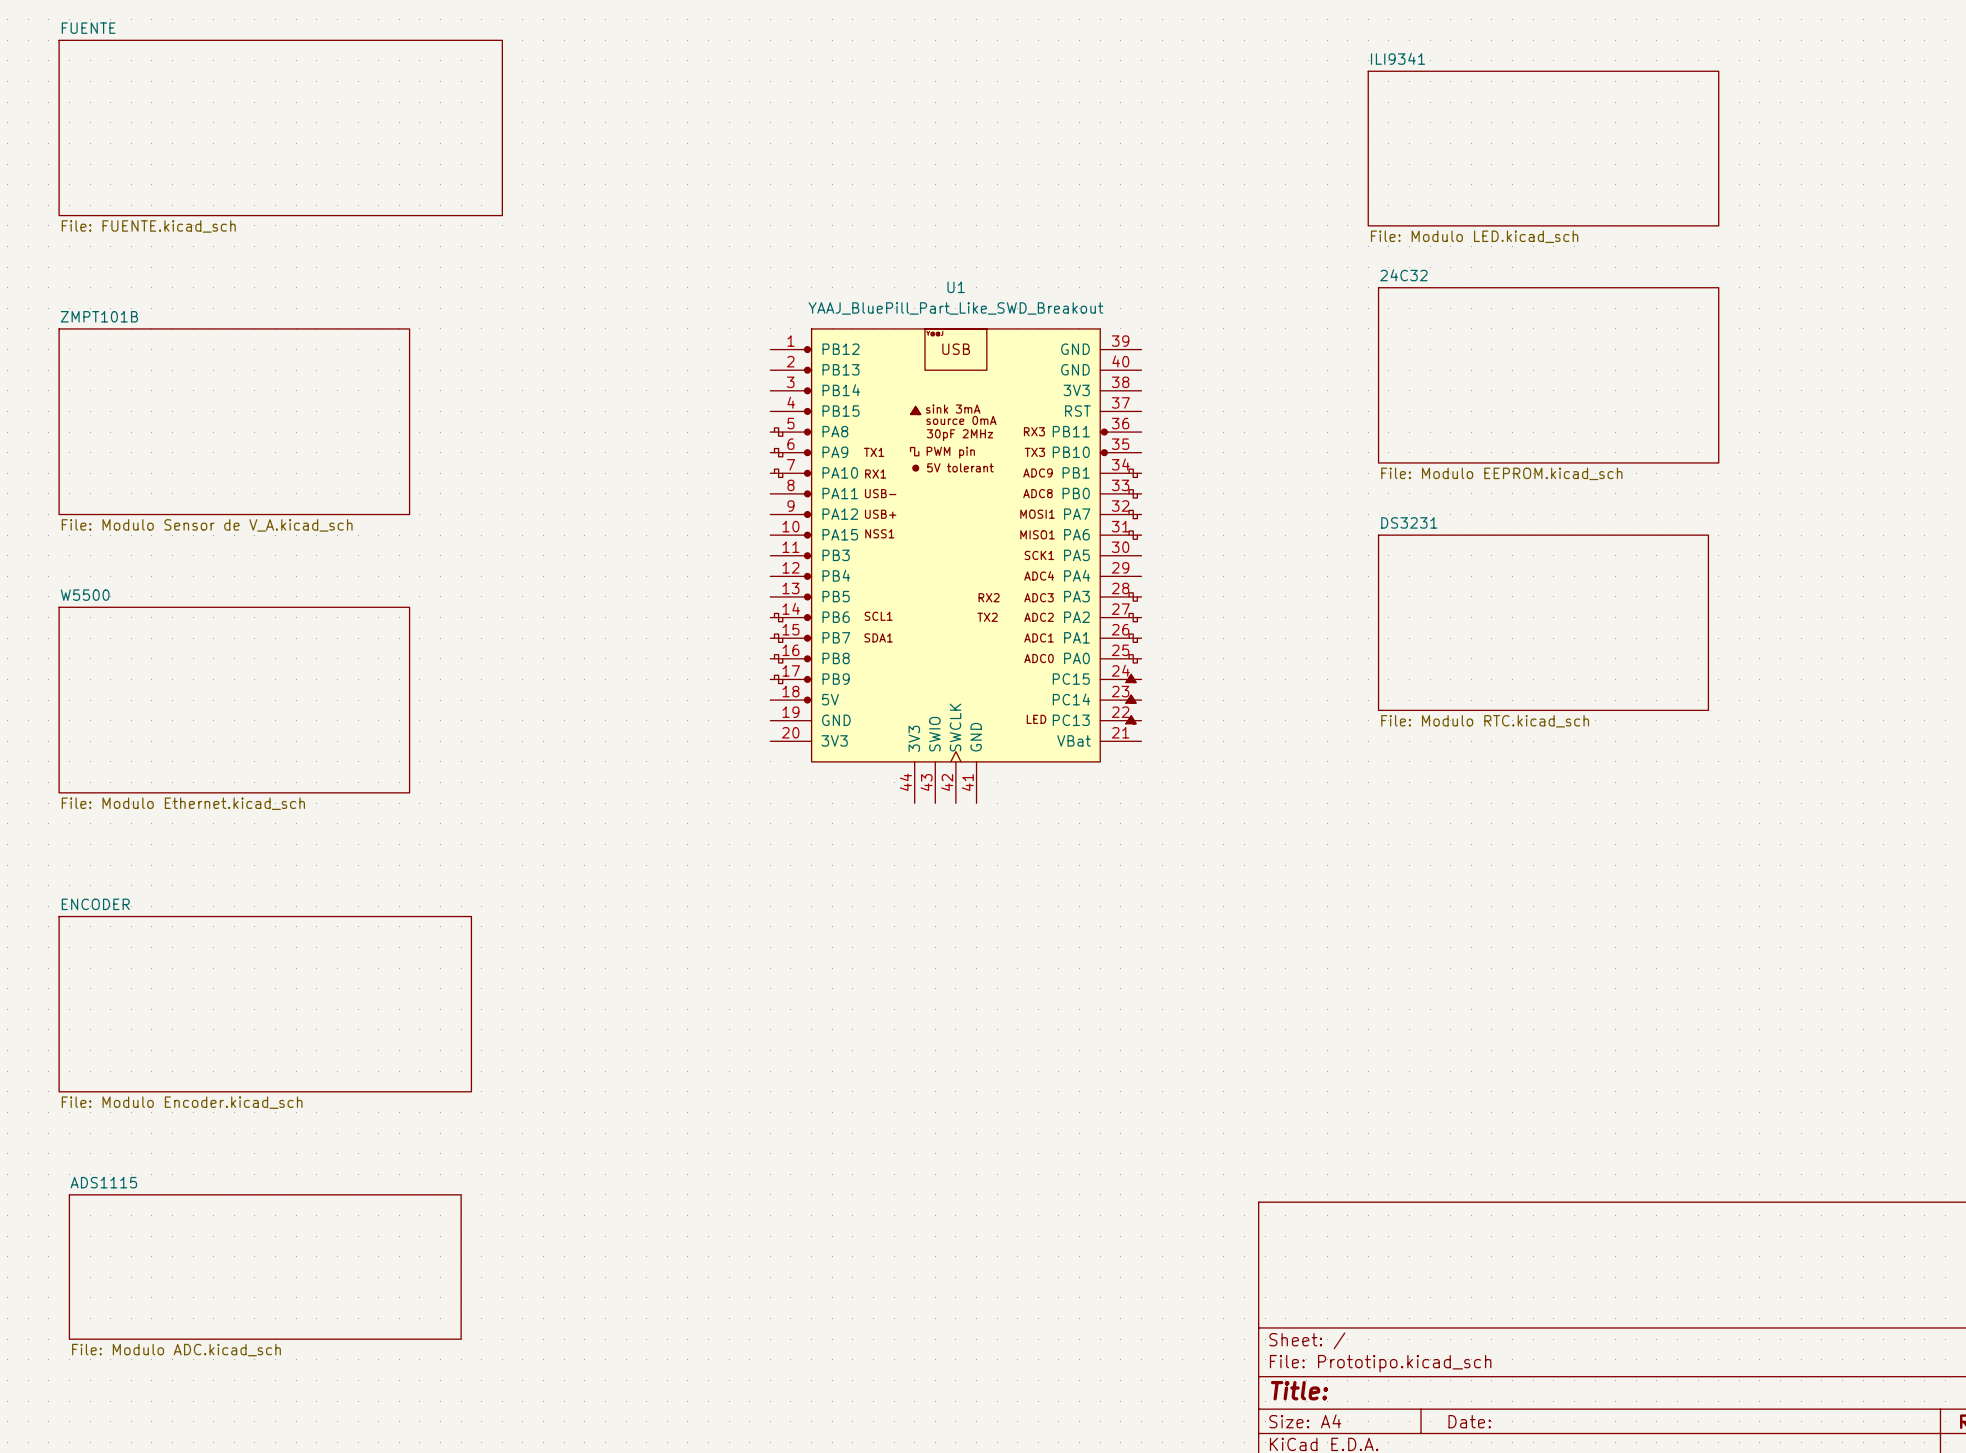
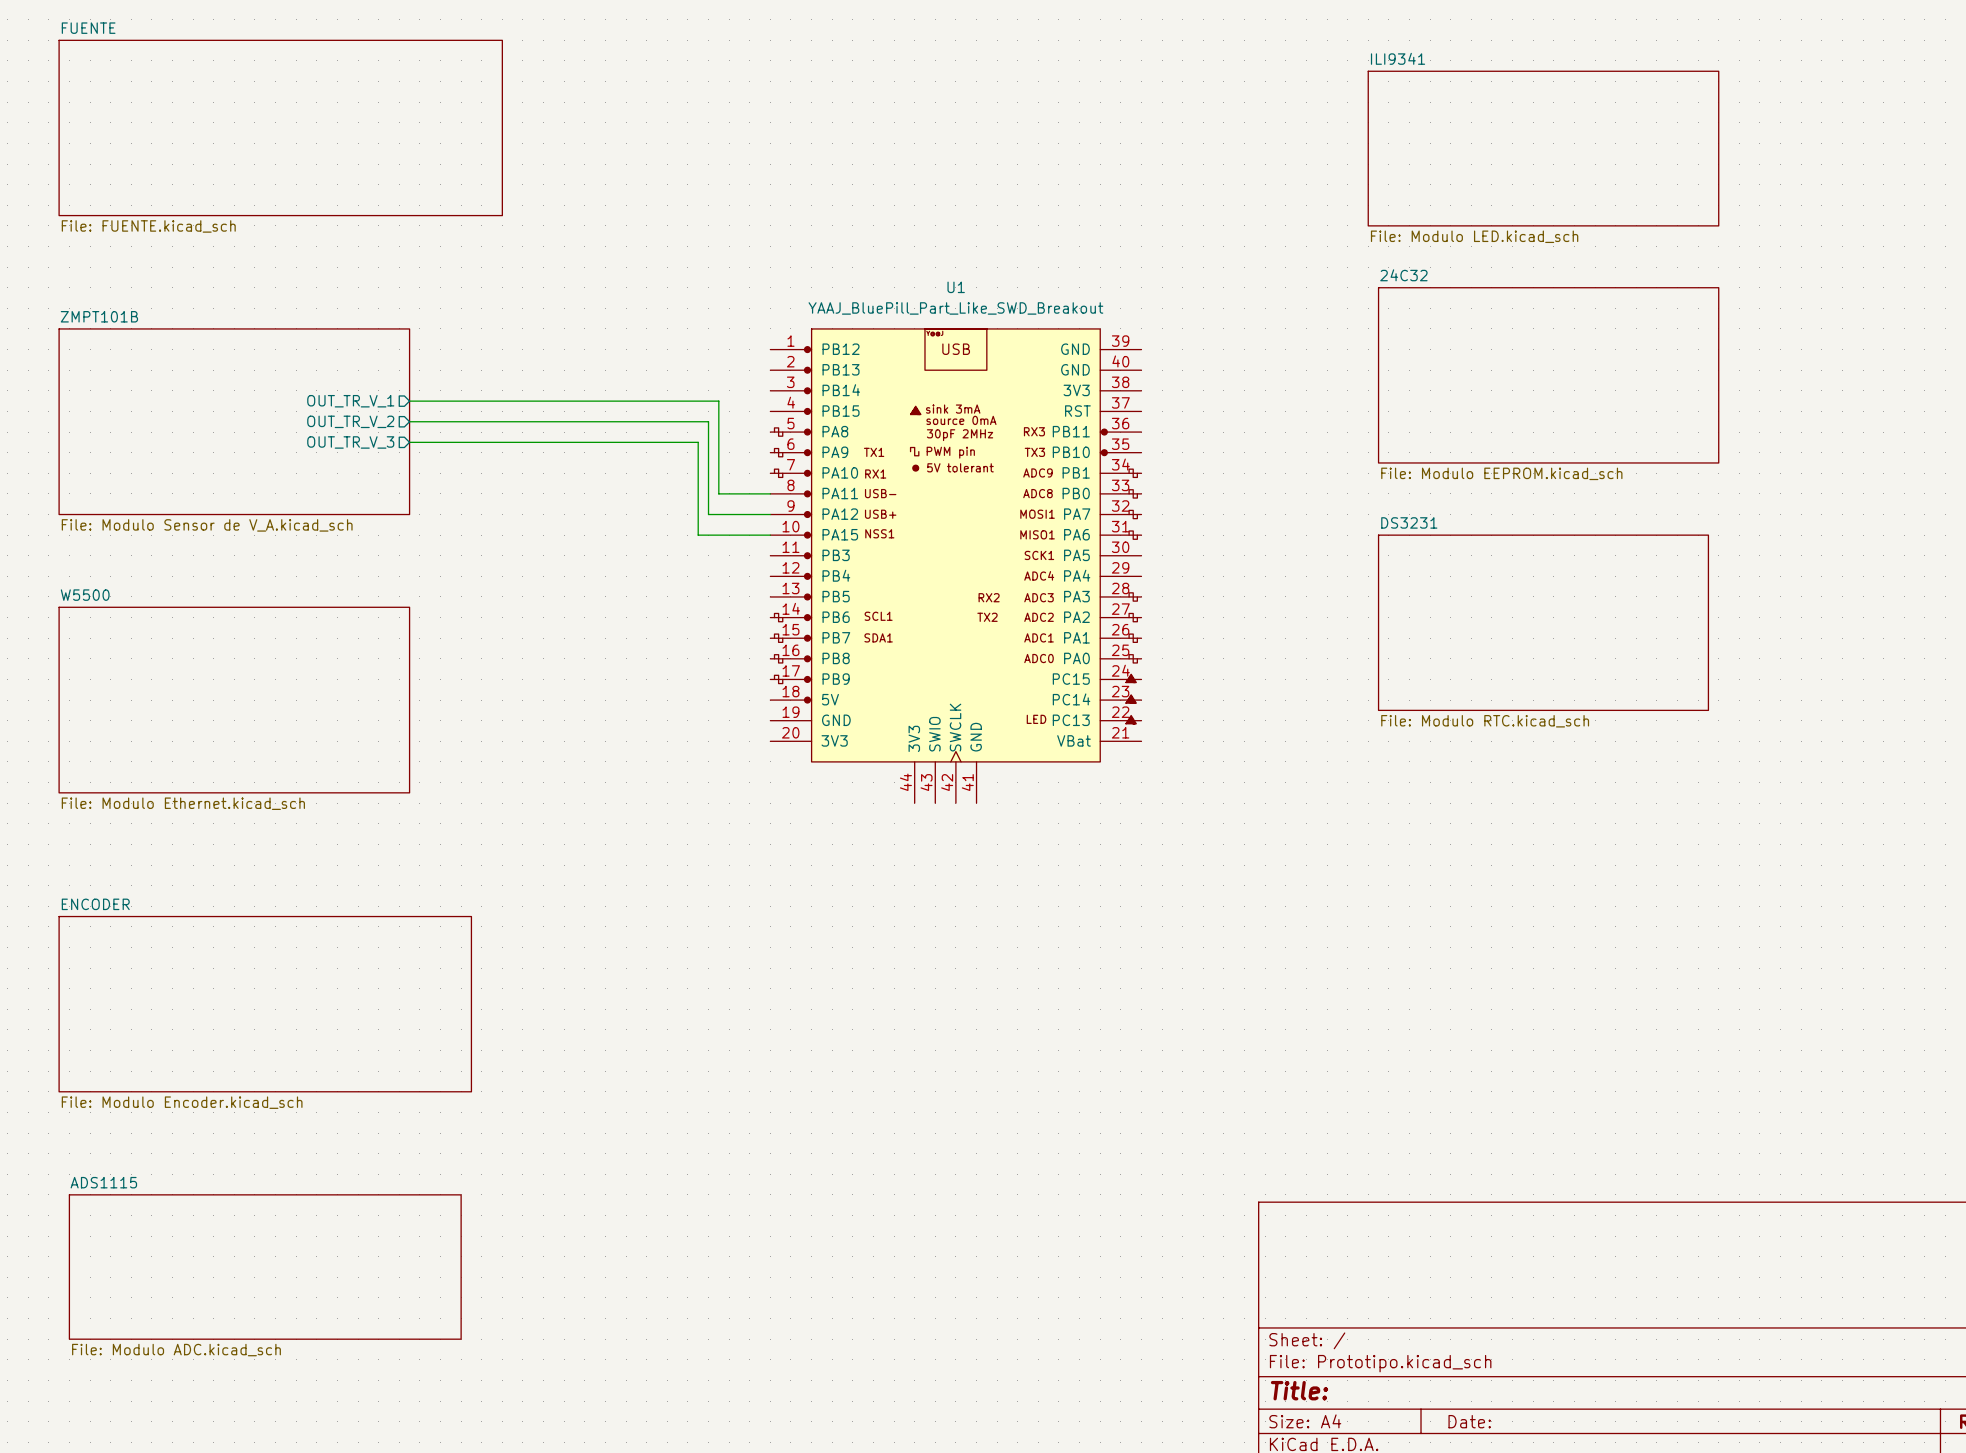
sheet pin: none -> OUT_TR_V_1 (350, 401)
wire: none -> (409, 401) (718, 401) (718, 493) (770, 493)
sheet pin: none -> OUT_TR_V_2 (350, 421)
wire: none -> (409, 421) (708, 421) (708, 514) (770, 514)
sheet pin: none -> OUT_TR_V_3 (350, 442)
wire: none -> (409, 442) (698, 442) (698, 535) (770, 535)

